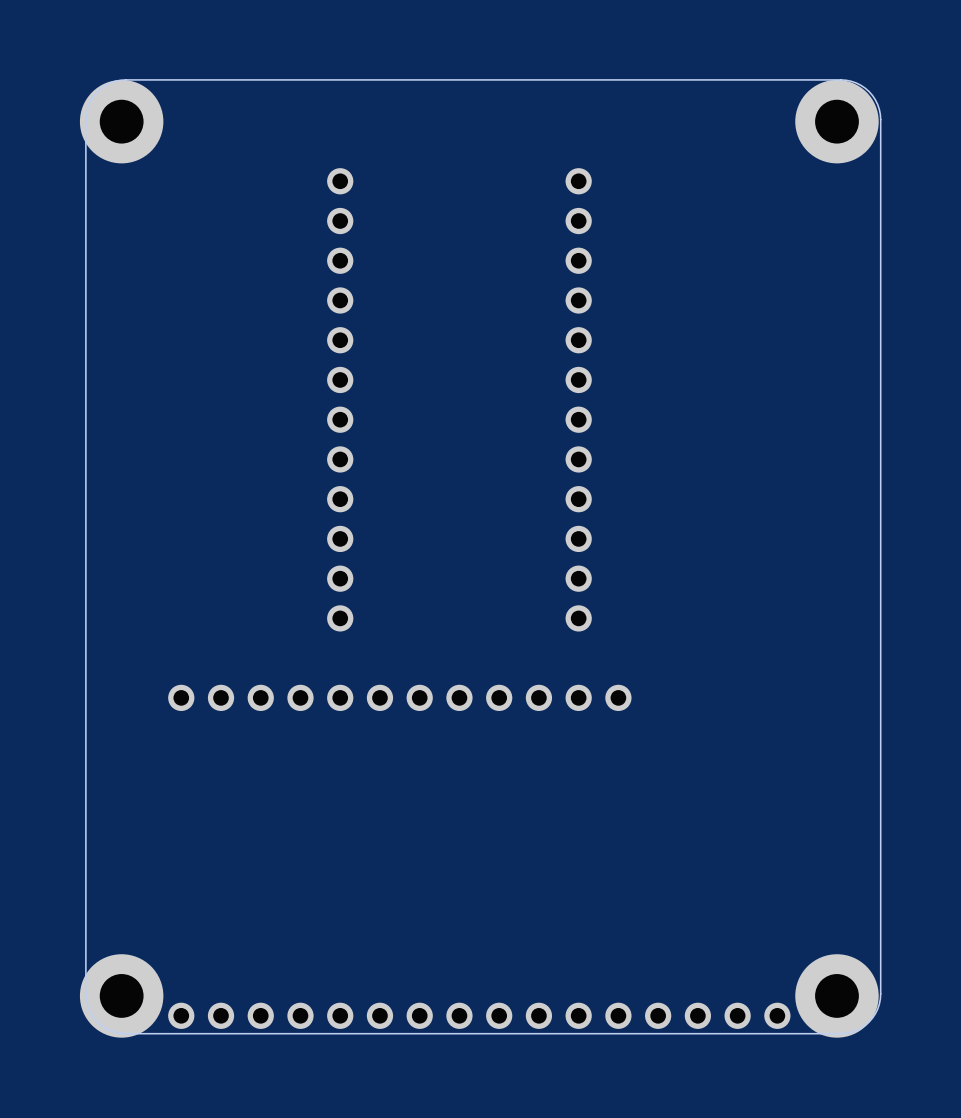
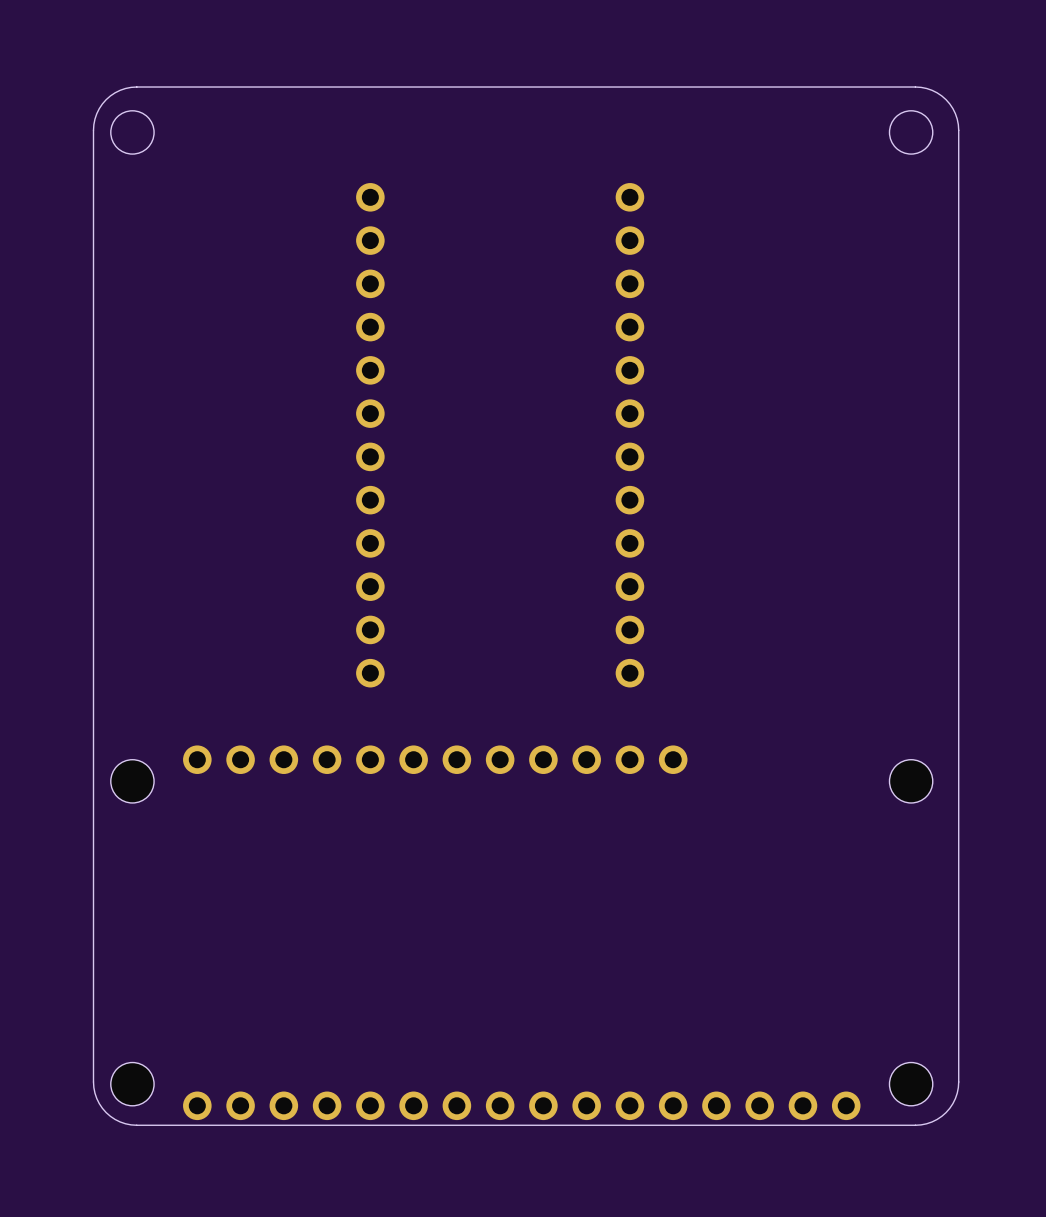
round board edge: none -> [110, 110, 155, 155]
round board edge: none -> [889, 110, 933, 155]
part: (121, 121) -> none
part: (836, 121) -> none
hole: none -> (132, 781)
hole: none -> (911, 781)
part: (121, 995) -> none
hole: none -> (132, 1084)
part: (836, 995) -> none
hole: none -> (911, 1084)

